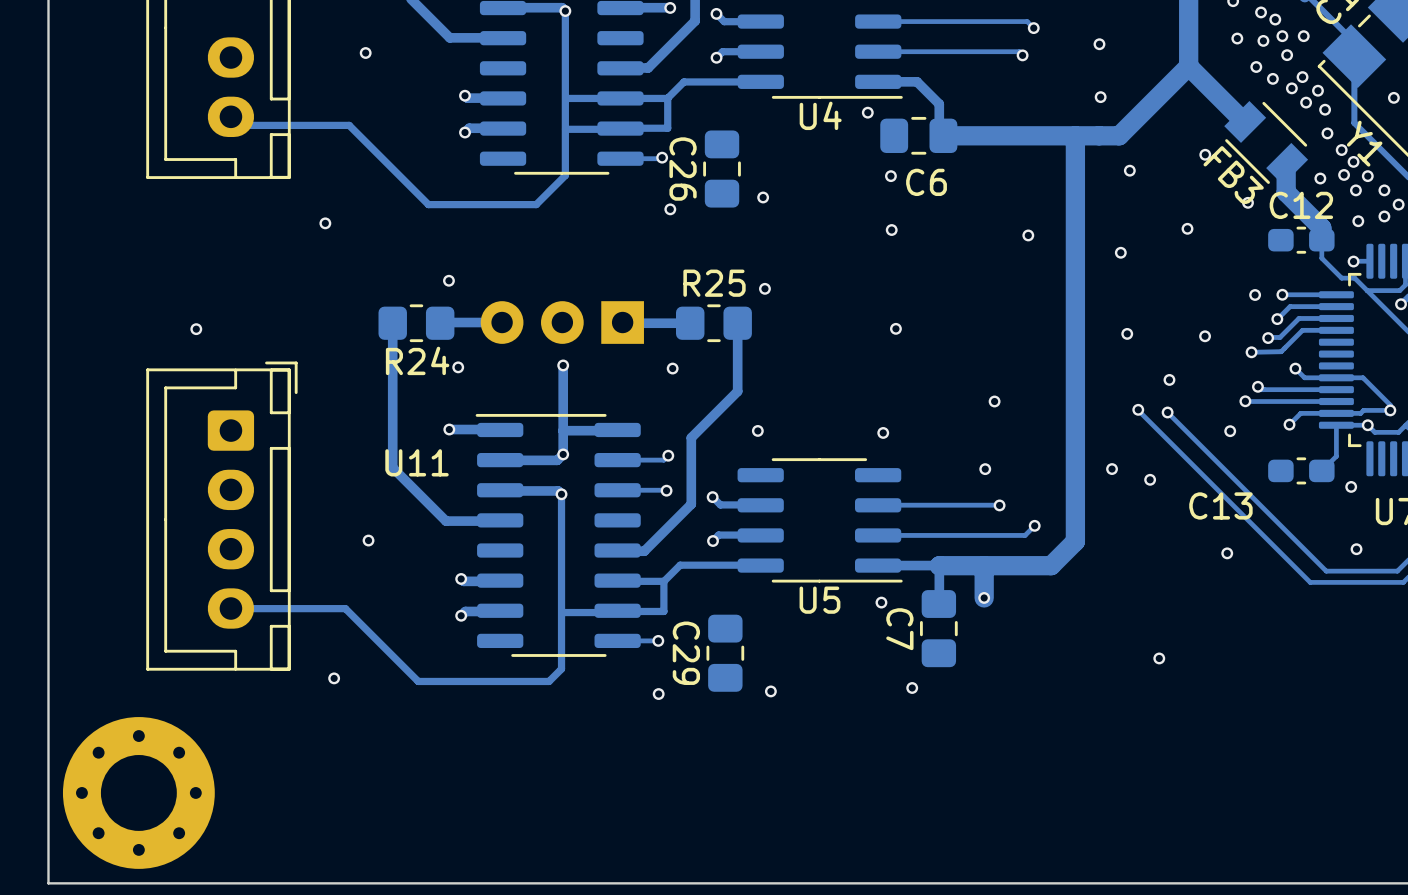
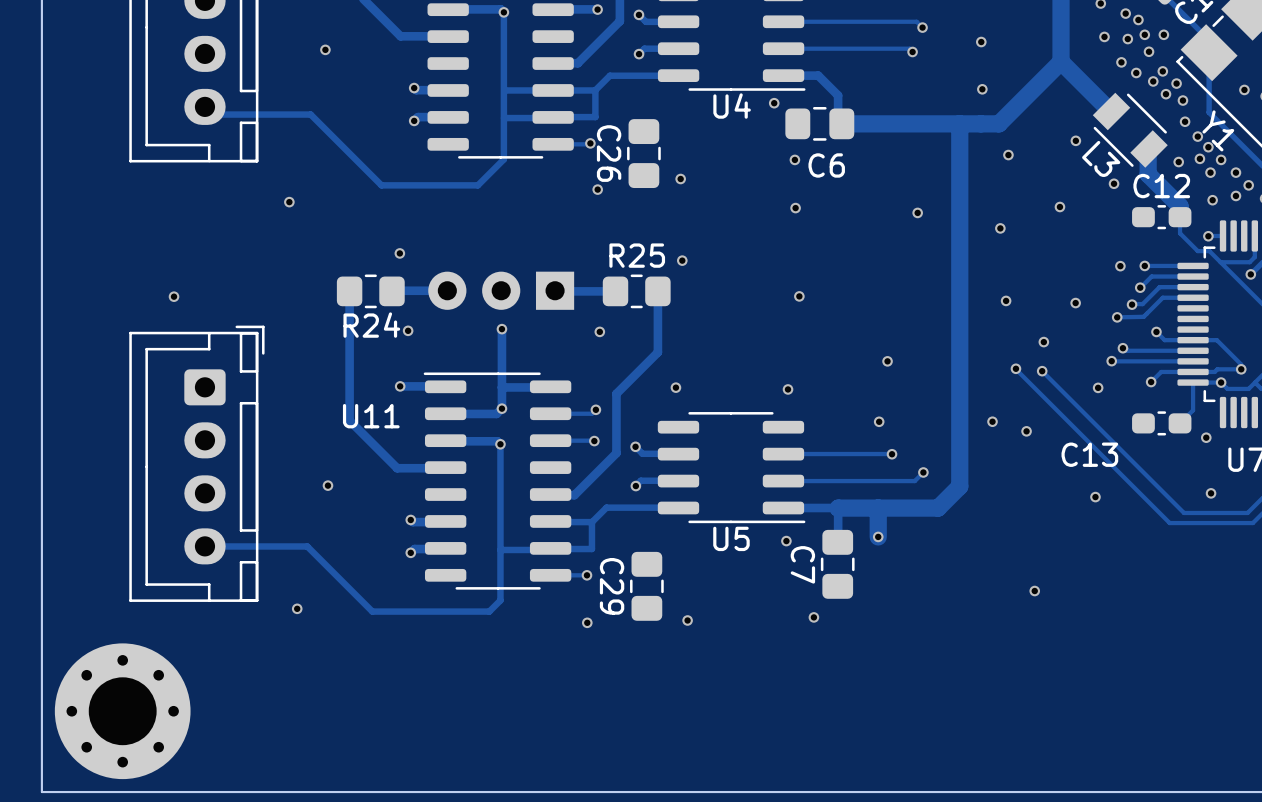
FB3 name: FB3 (1233, 175) -> L3 (1101, 158)

